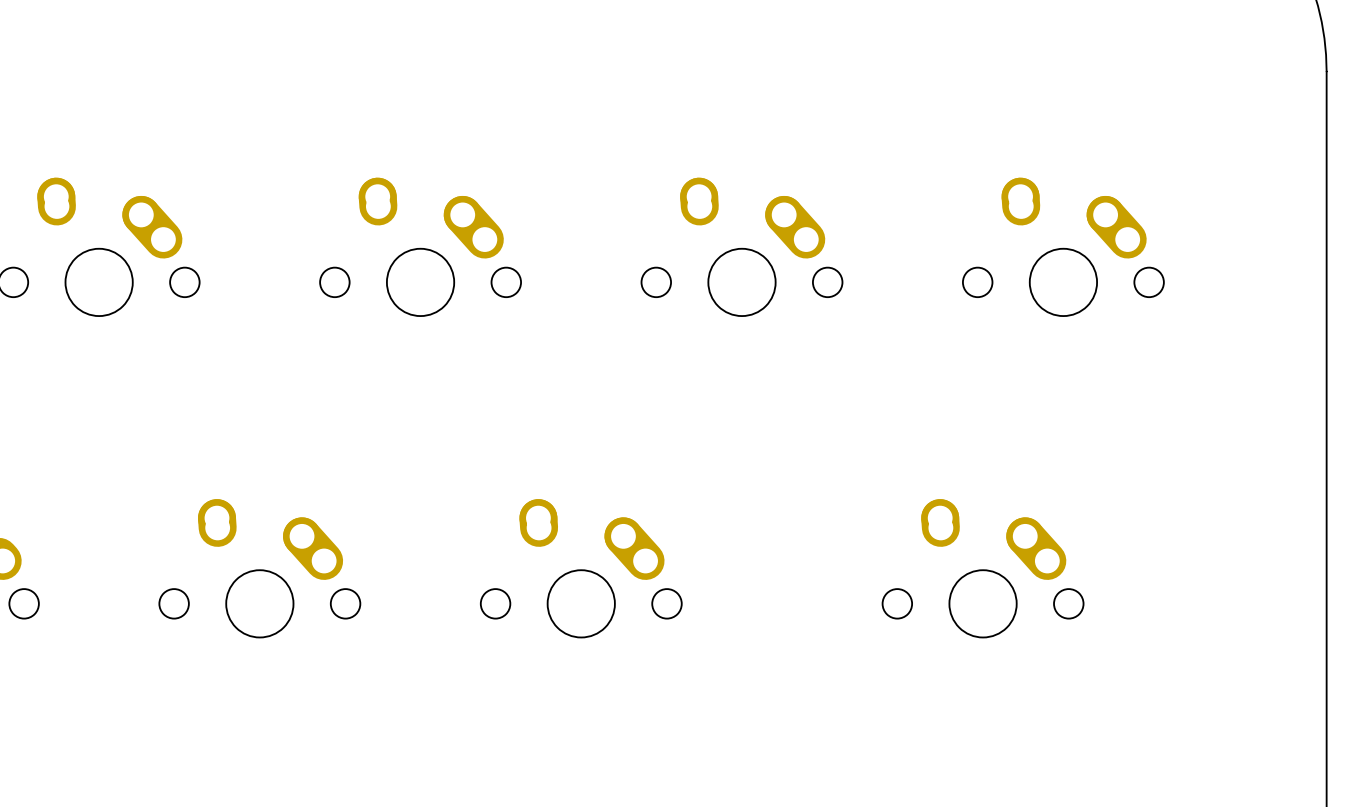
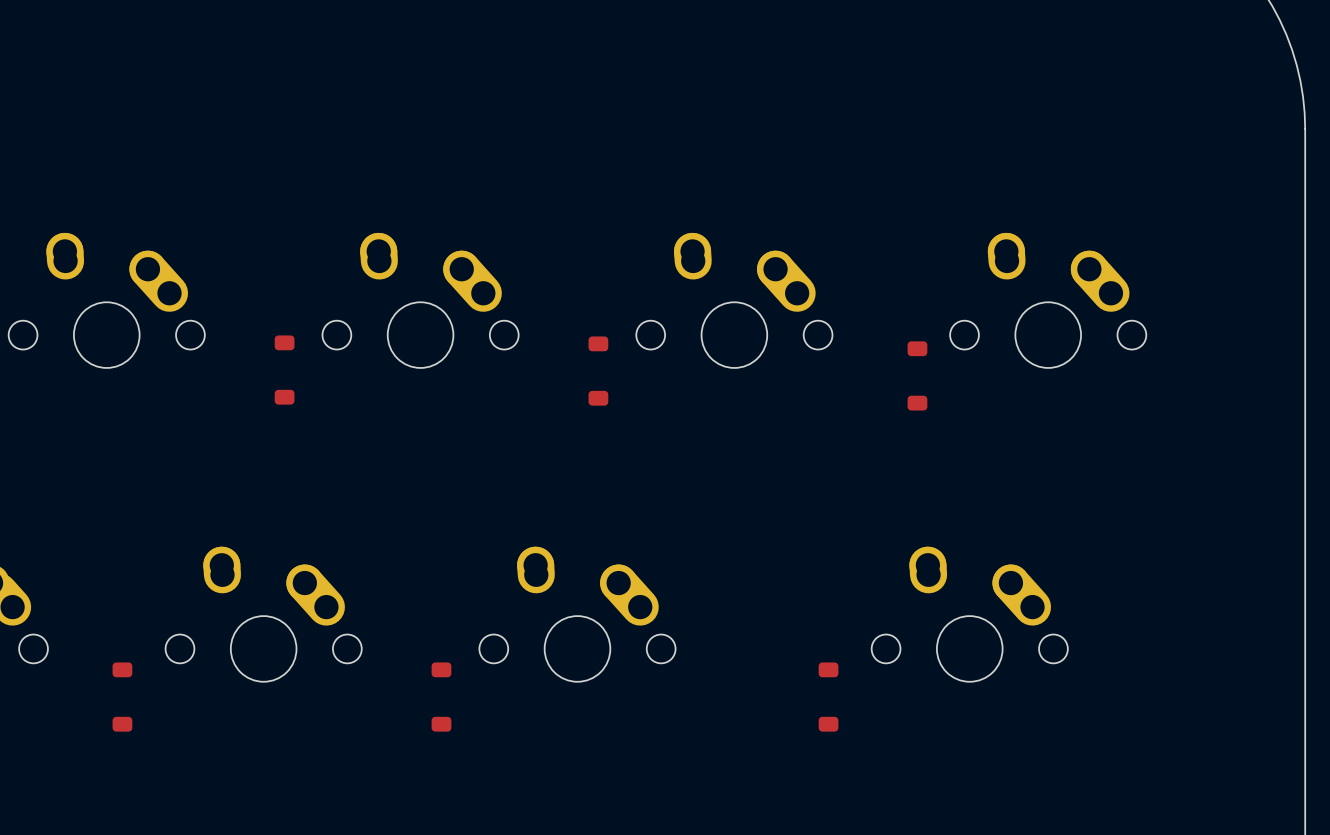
part: none -> (284, 370)
part: none -> (598, 371)
part: none -> (917, 375)
part: none -> (122, 697)
part: none -> (441, 697)
part: none -> (828, 697)

